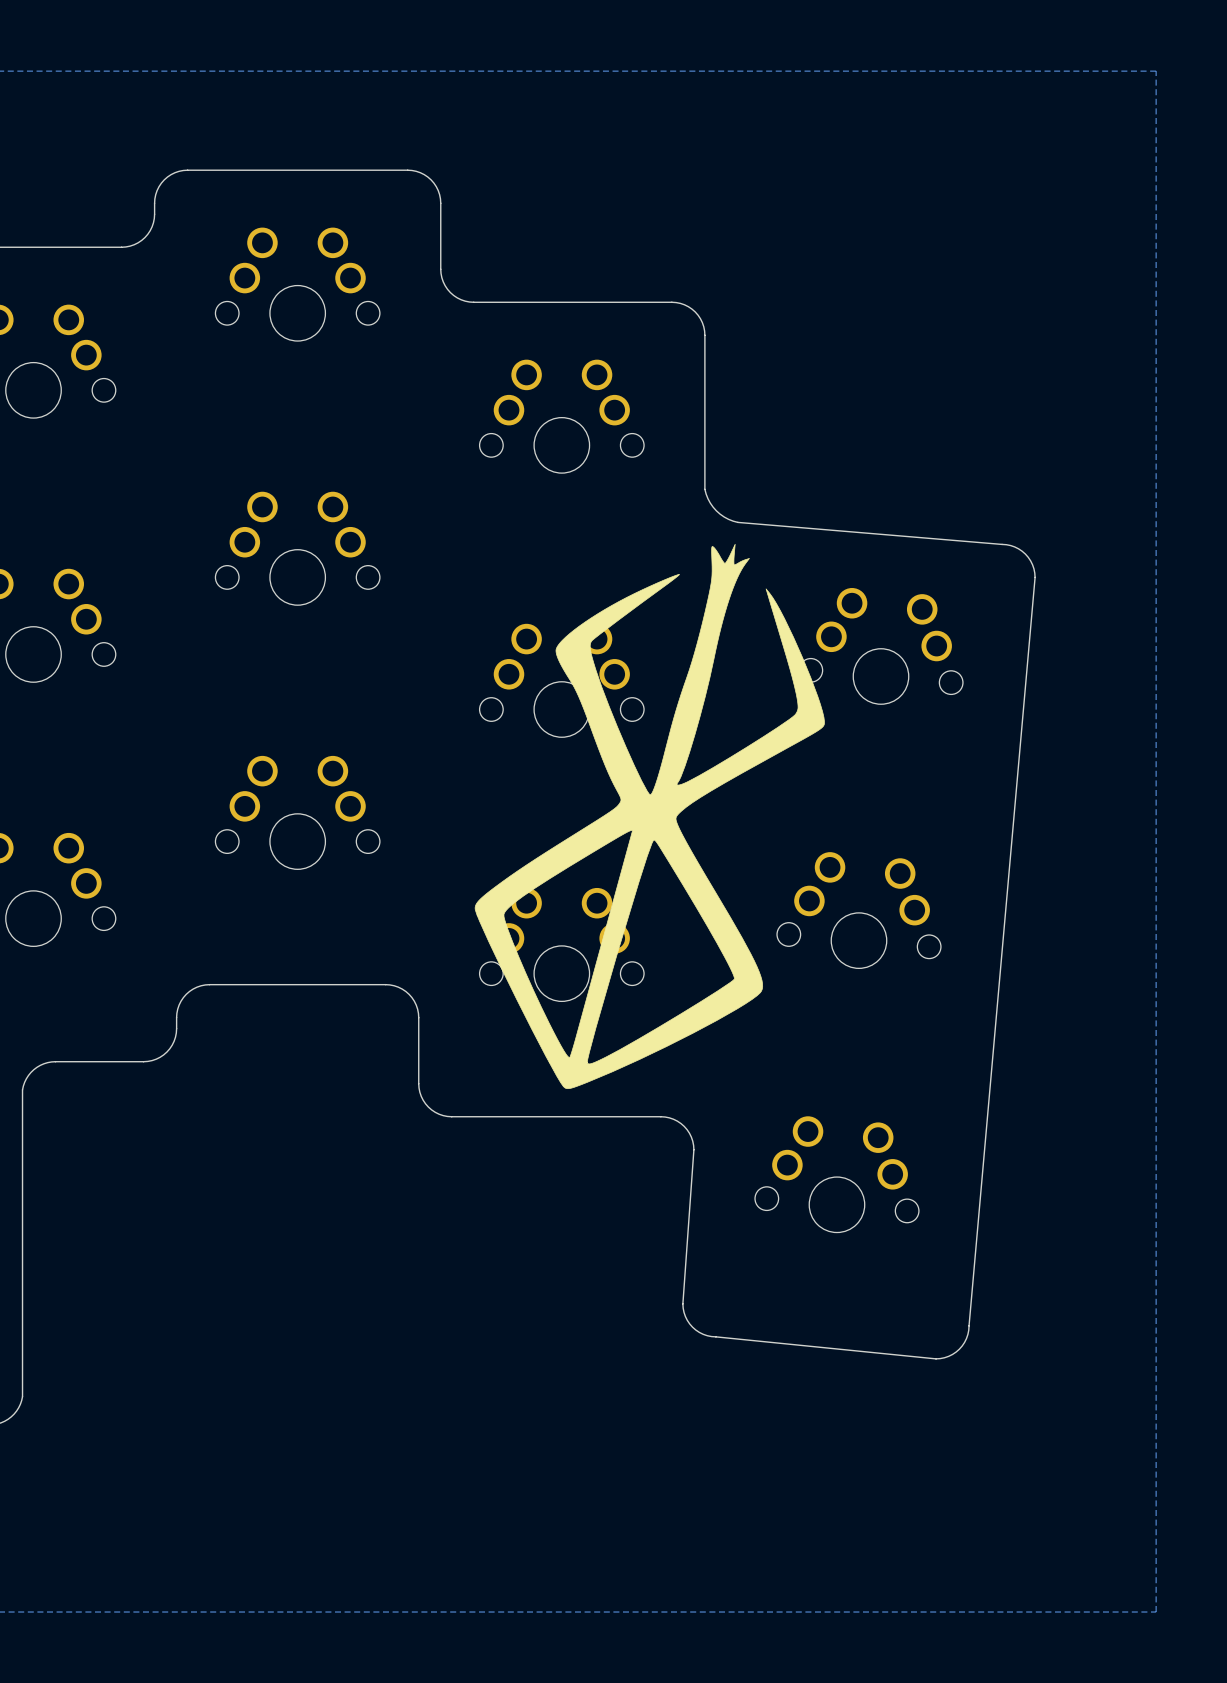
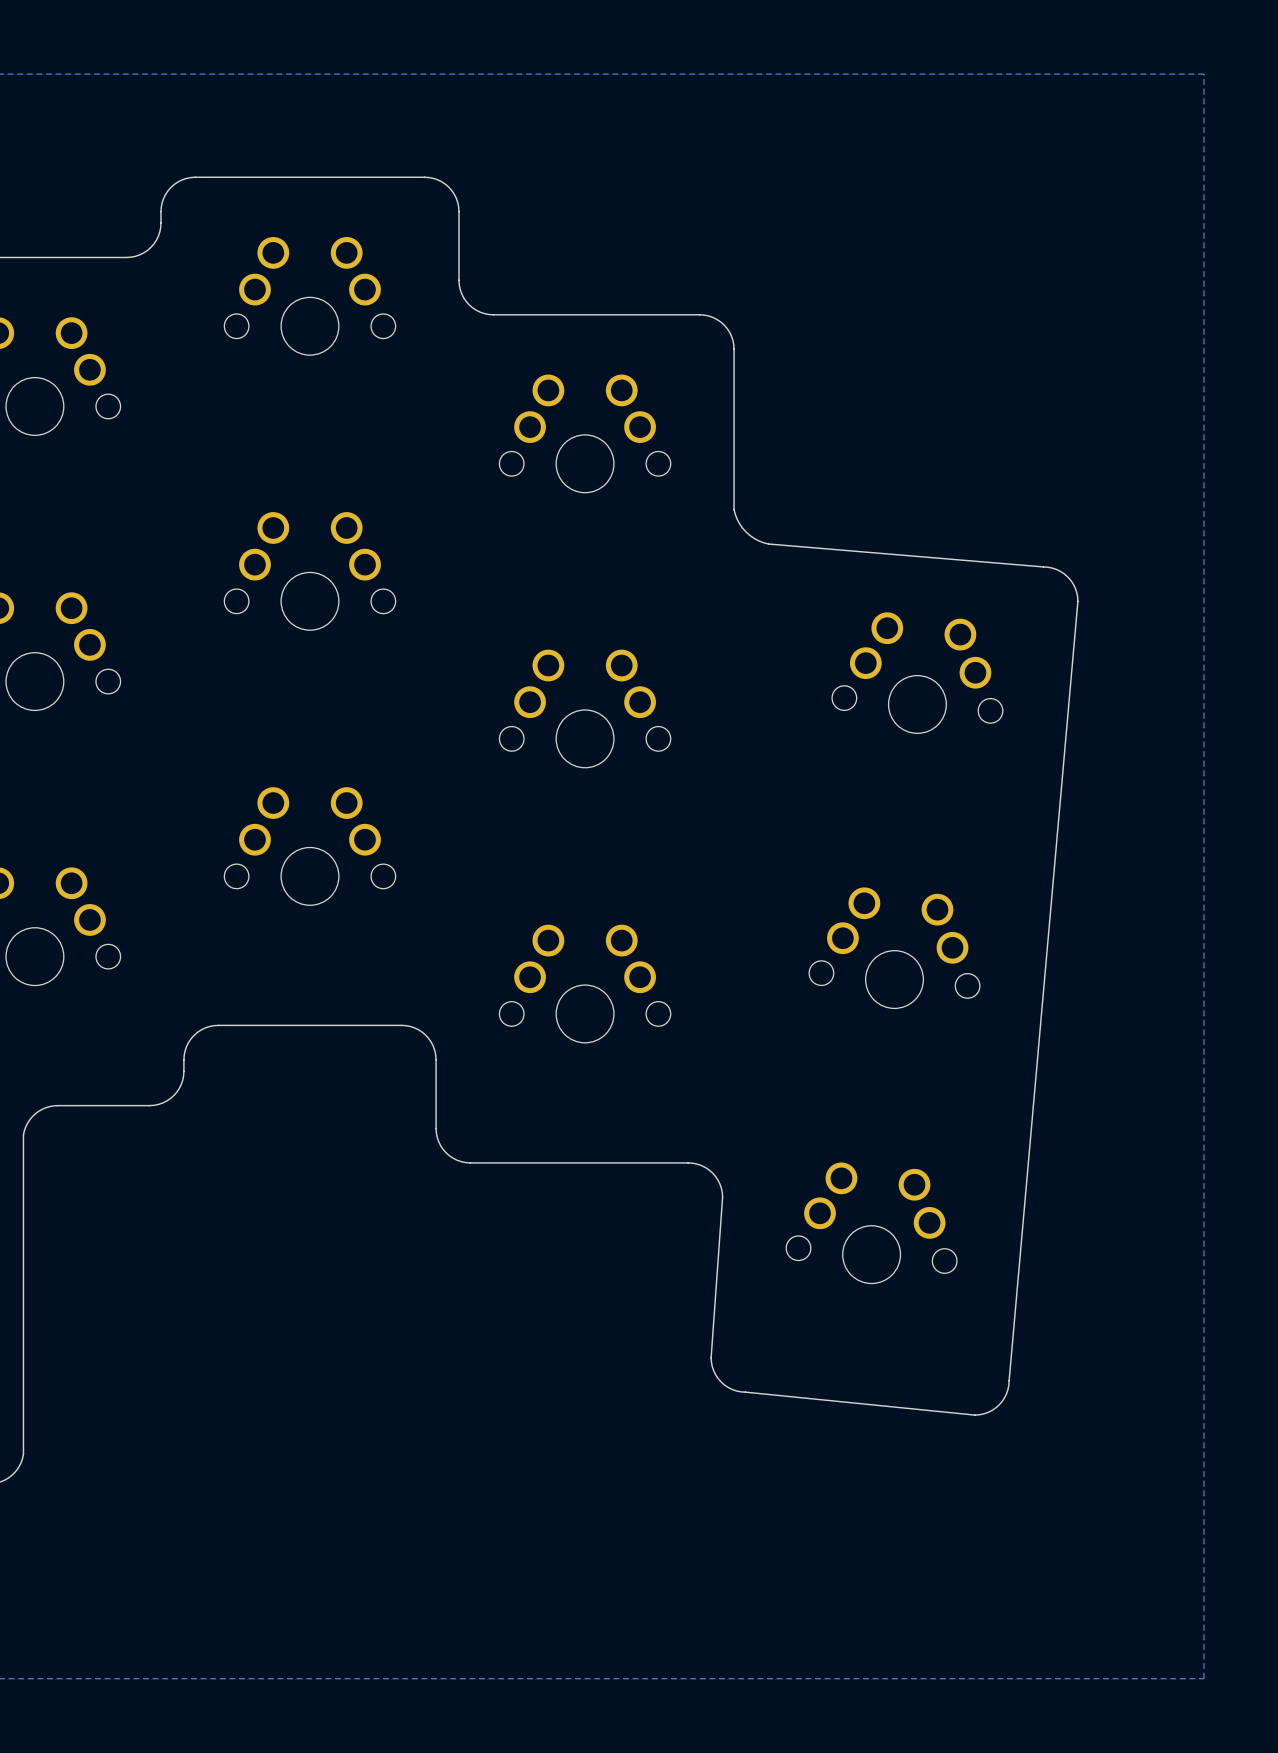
drawing: [474, 543, 825, 1090] -> none

